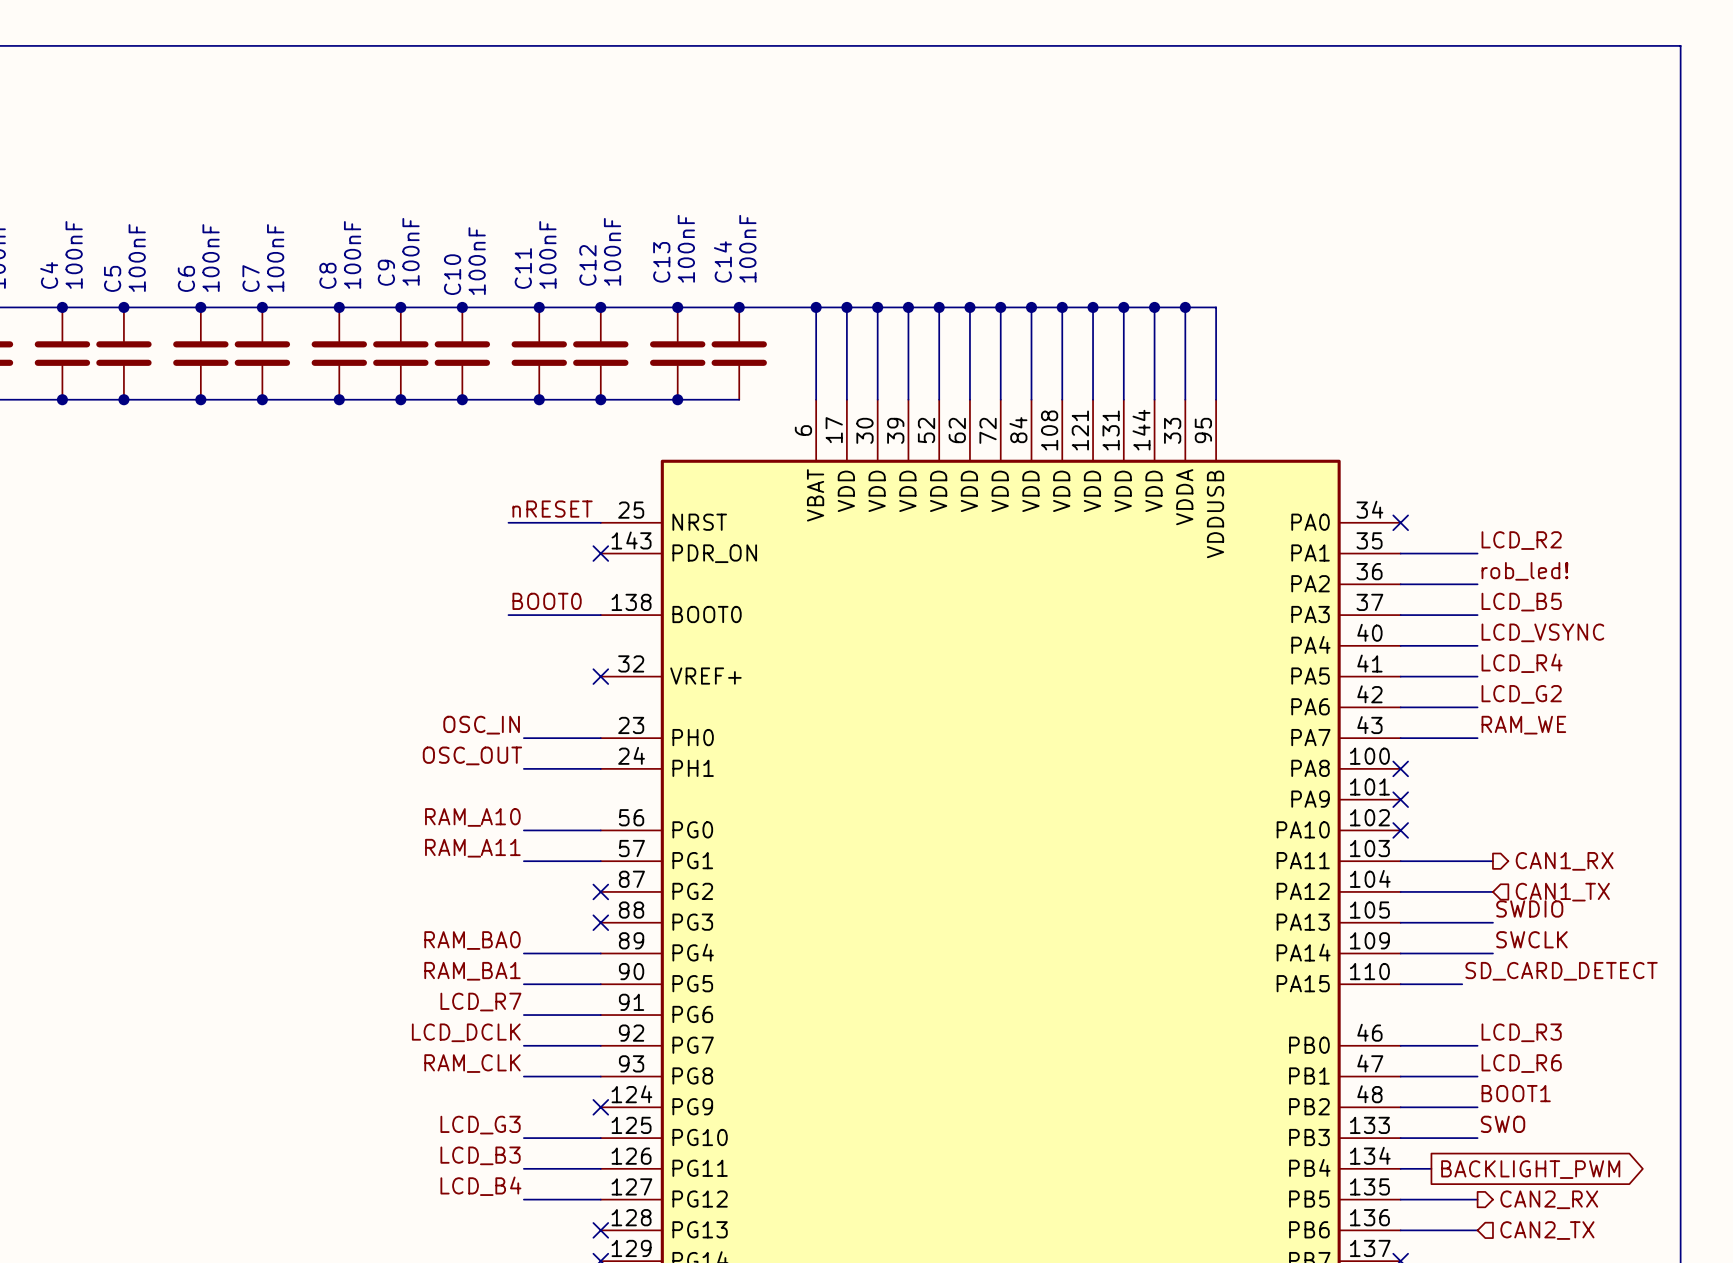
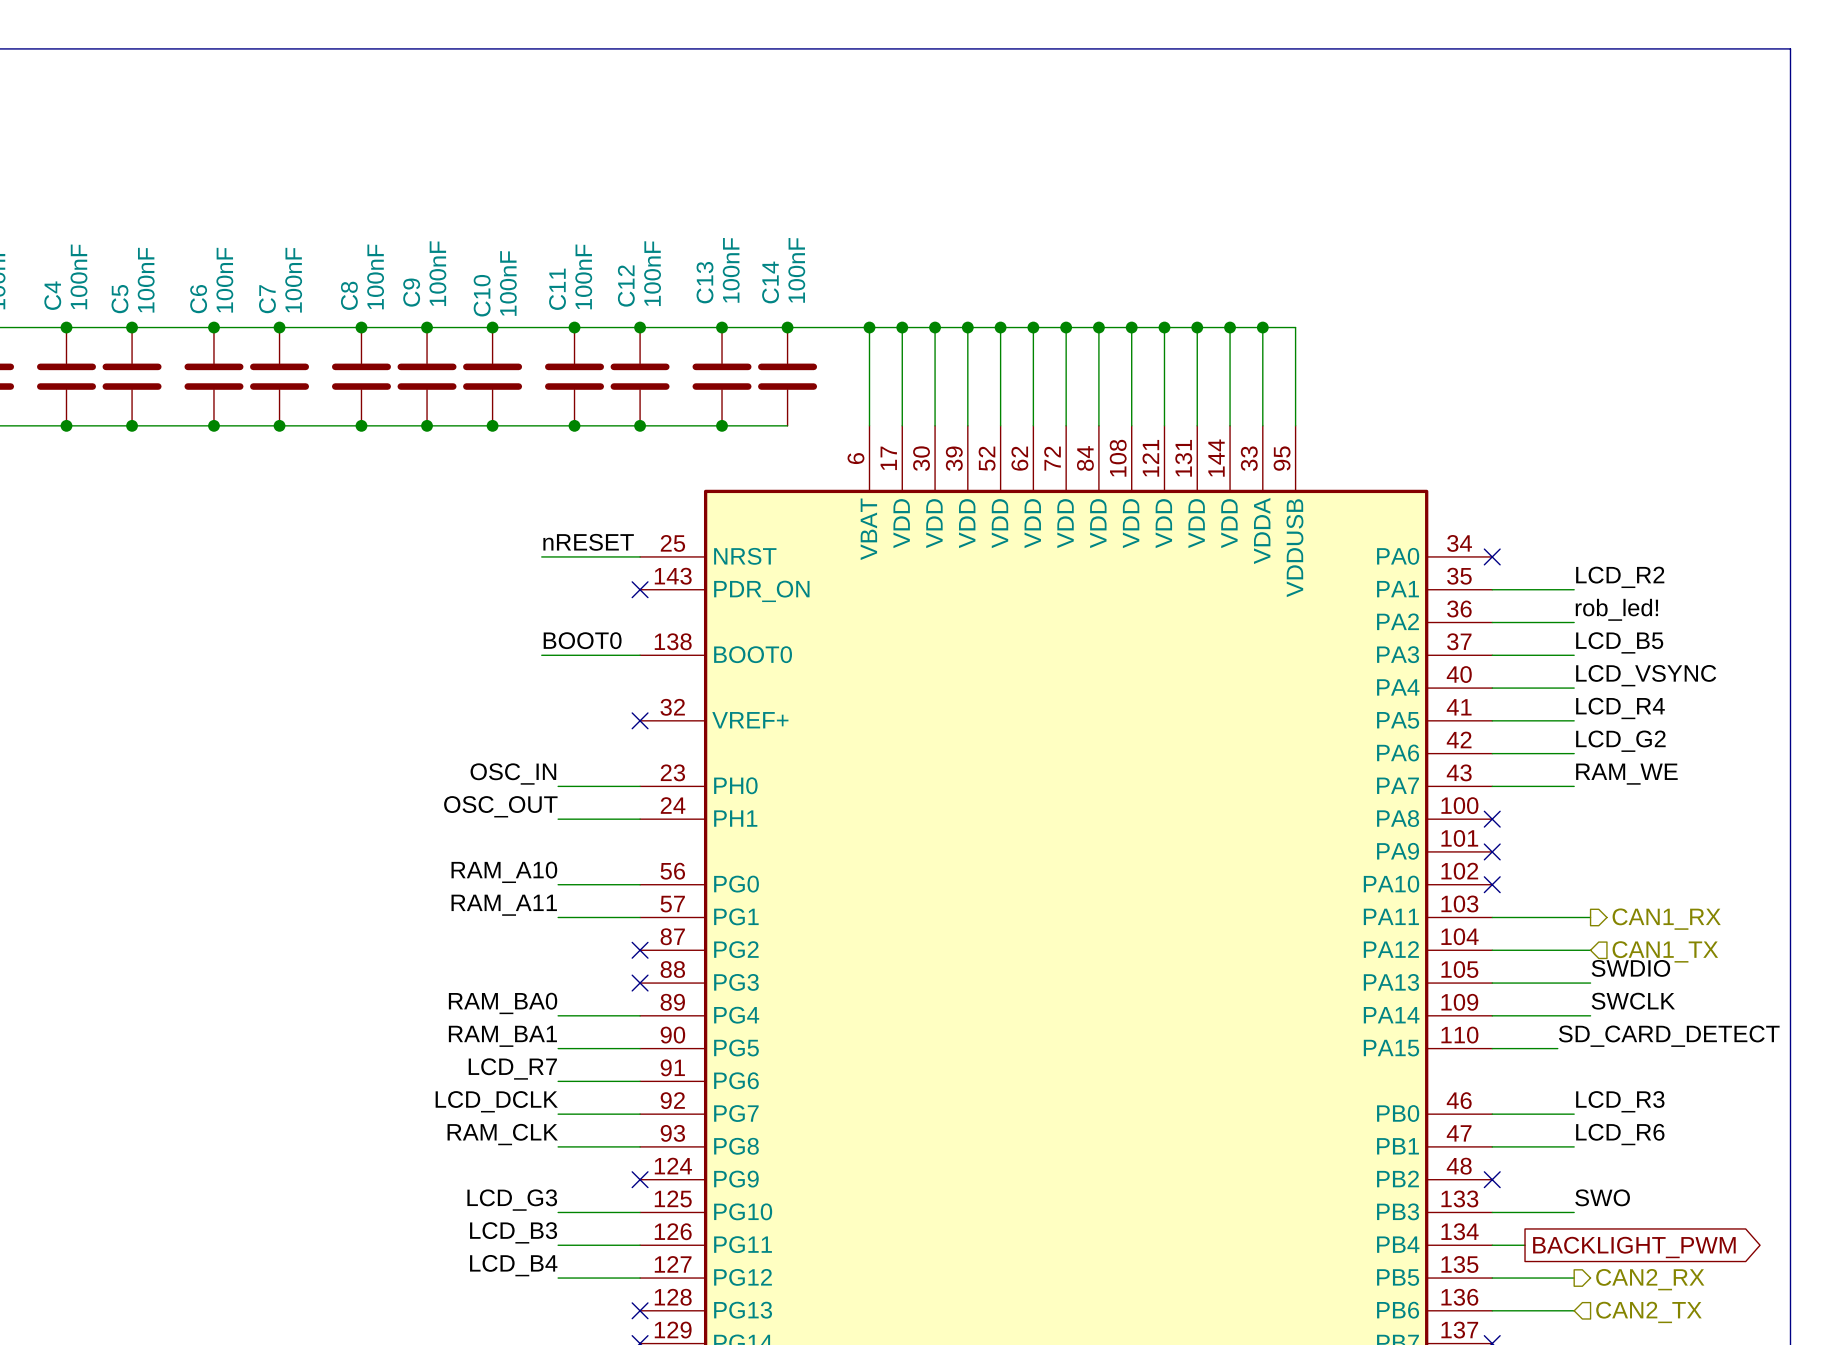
label: BOOT1 (1516, 1093) -> none
wire: (1400, 1107) (1477, 1107) -> none
no-connect mark: none -> (1492, 1179)

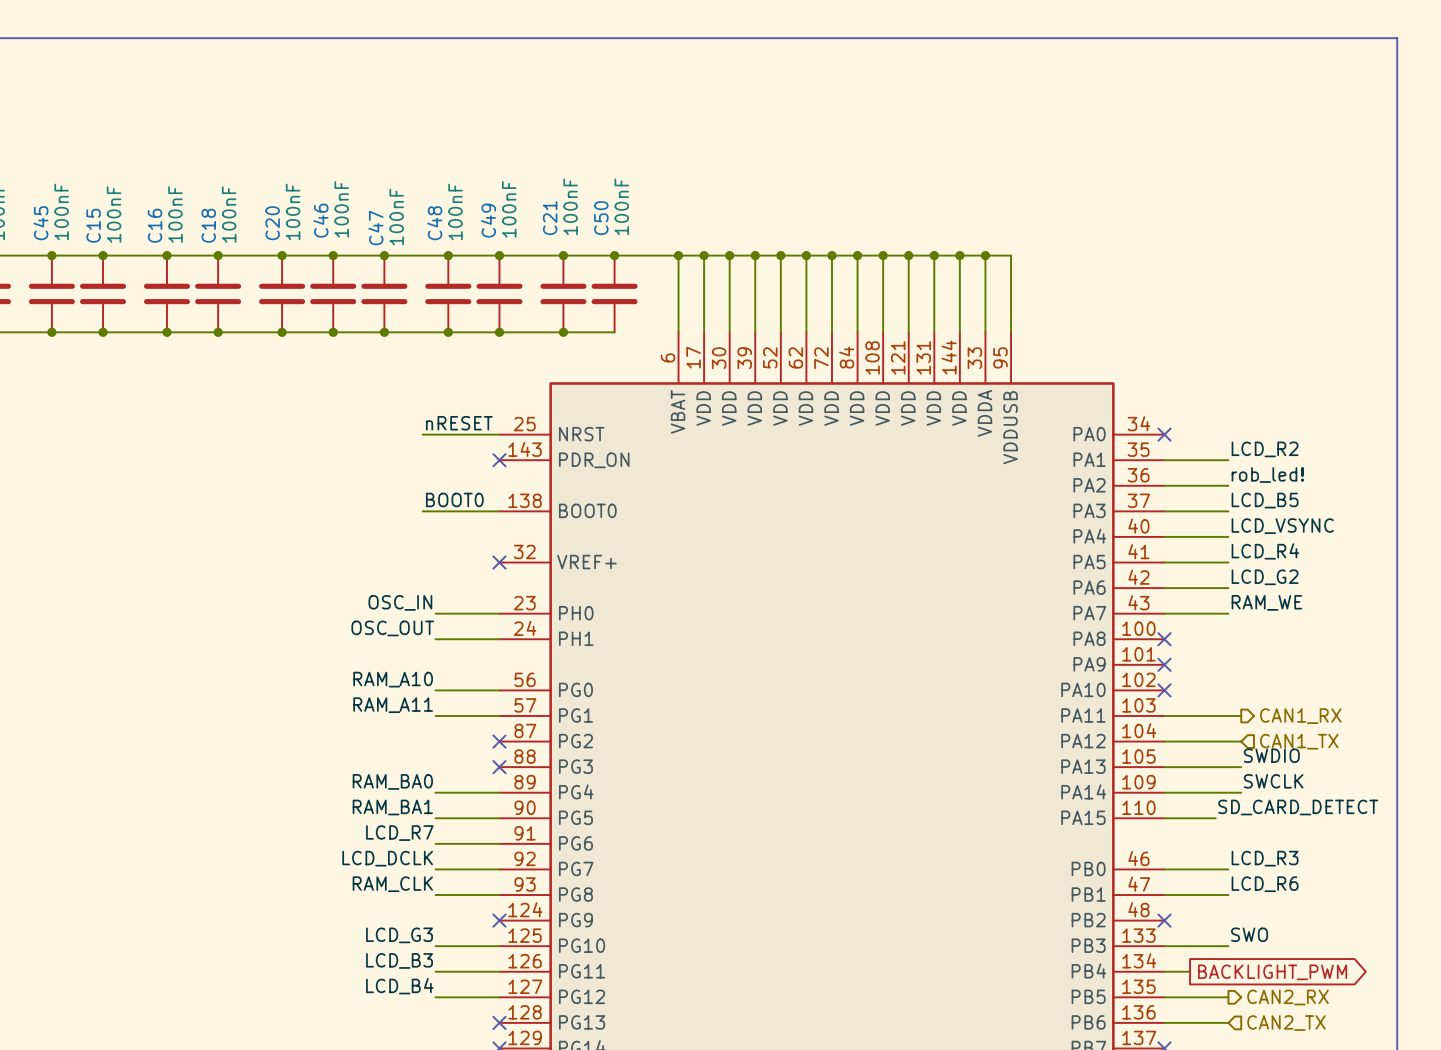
C13 name: C13 (705, 282) -> C21 (550, 218)
C14 name: C14 (770, 282) -> C50 (601, 218)
C12 name: C12 (626, 286) -> C49 (488, 220)
C11 name: C11 (557, 289) -> C48 (434, 223)
C9 name: C9 (411, 292) -> C46 (320, 220)
C4 name: C4 (52, 295) -> C45 (40, 223)
C8 name: C8 (349, 295) -> C20 (272, 223)
C10 name: C10 (482, 295) -> C47 (375, 228)
C5 name: C5 (119, 299) -> C15 (93, 225)
C6 name: C6 (198, 299) -> C16 (155, 225)
C7 name: C7 (267, 299) -> C18 (208, 225)

